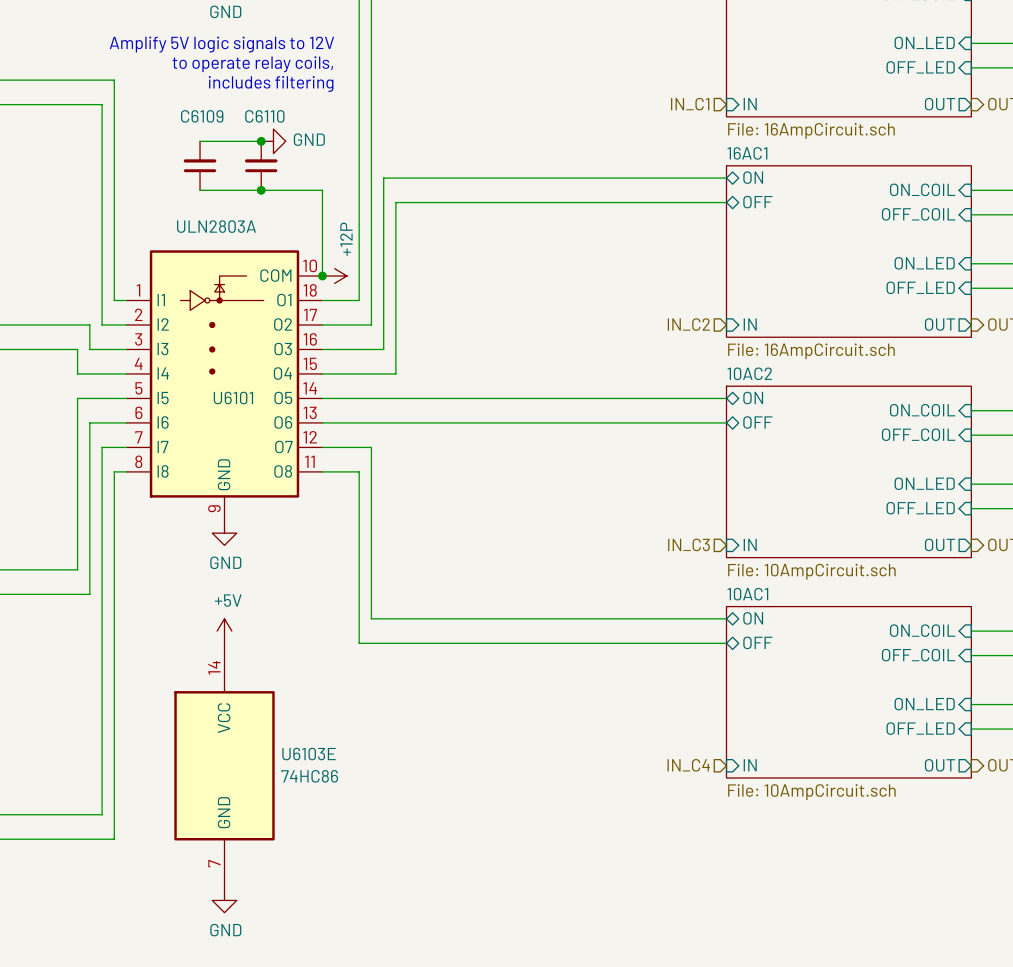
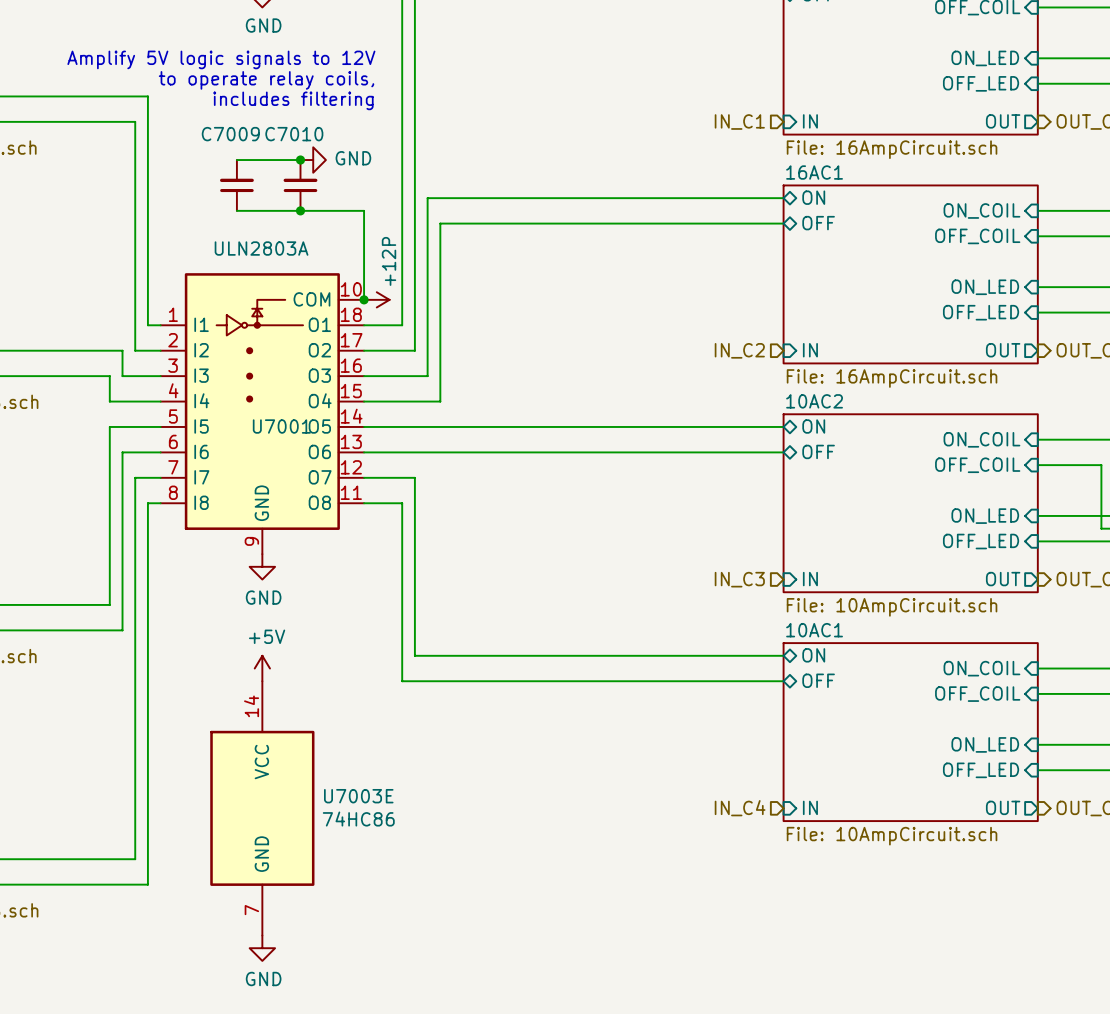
C6109 name: C6109 (202, 116) -> C7009 (230, 134)
C6110 name: C6110 (264, 116) -> C7010 (294, 134)
U6101 name: U6101 (233, 398) -> U7001 (281, 426)
U6103E name: U6103E (309, 754) -> U7003E (358, 796)

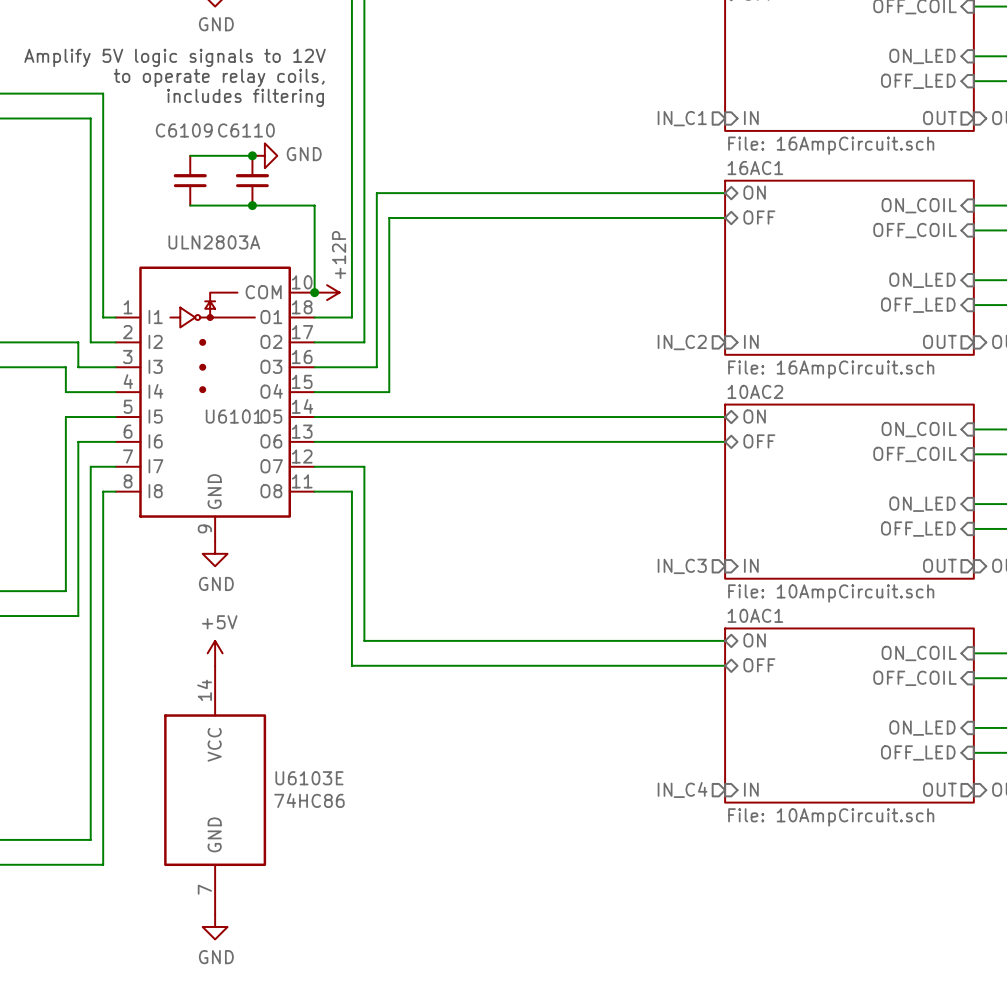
C7009 name: C7009 (230, 134) -> C6109 (184, 130)
C7010 name: C7010 (294, 134) -> C6110 (246, 130)
U7001 name: U7001 (281, 426) -> U6101 (234, 416)
U7003E name: U7003E (358, 796) -> U6103E (309, 778)

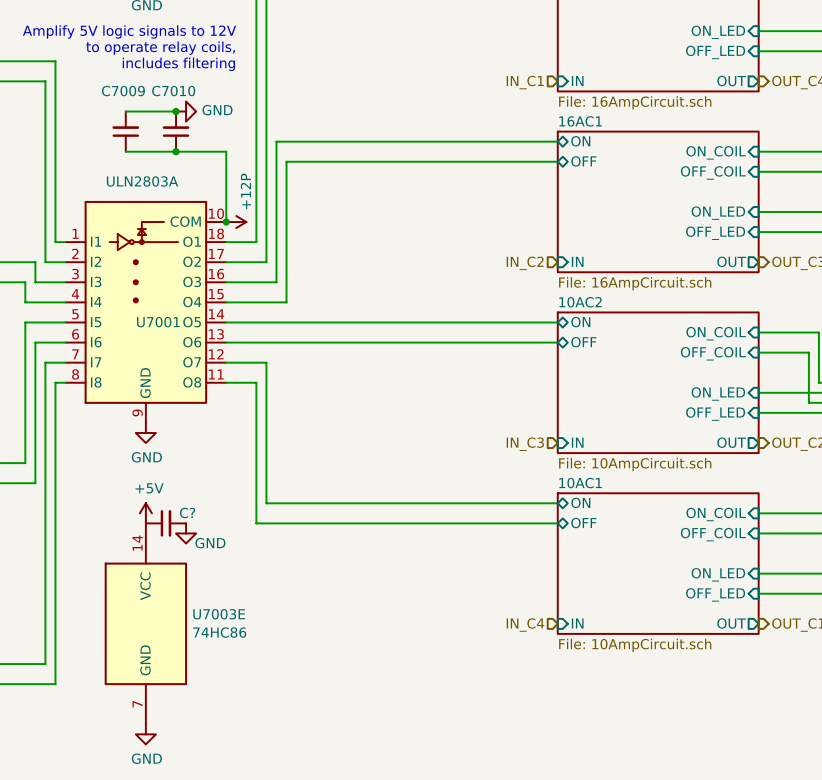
C6109 name: C6109 (184, 130) -> C7009 (123, 91)
C6110 name: C6110 (246, 130) -> C7010 (173, 91)
U6101 name: U6101 (234, 416) -> U7001 (158, 322)
C?: none -> (165, 523)
power symbol: none -> GND (186, 533)
U6103E name: U6103E (309, 778) -> U7003E (219, 614)

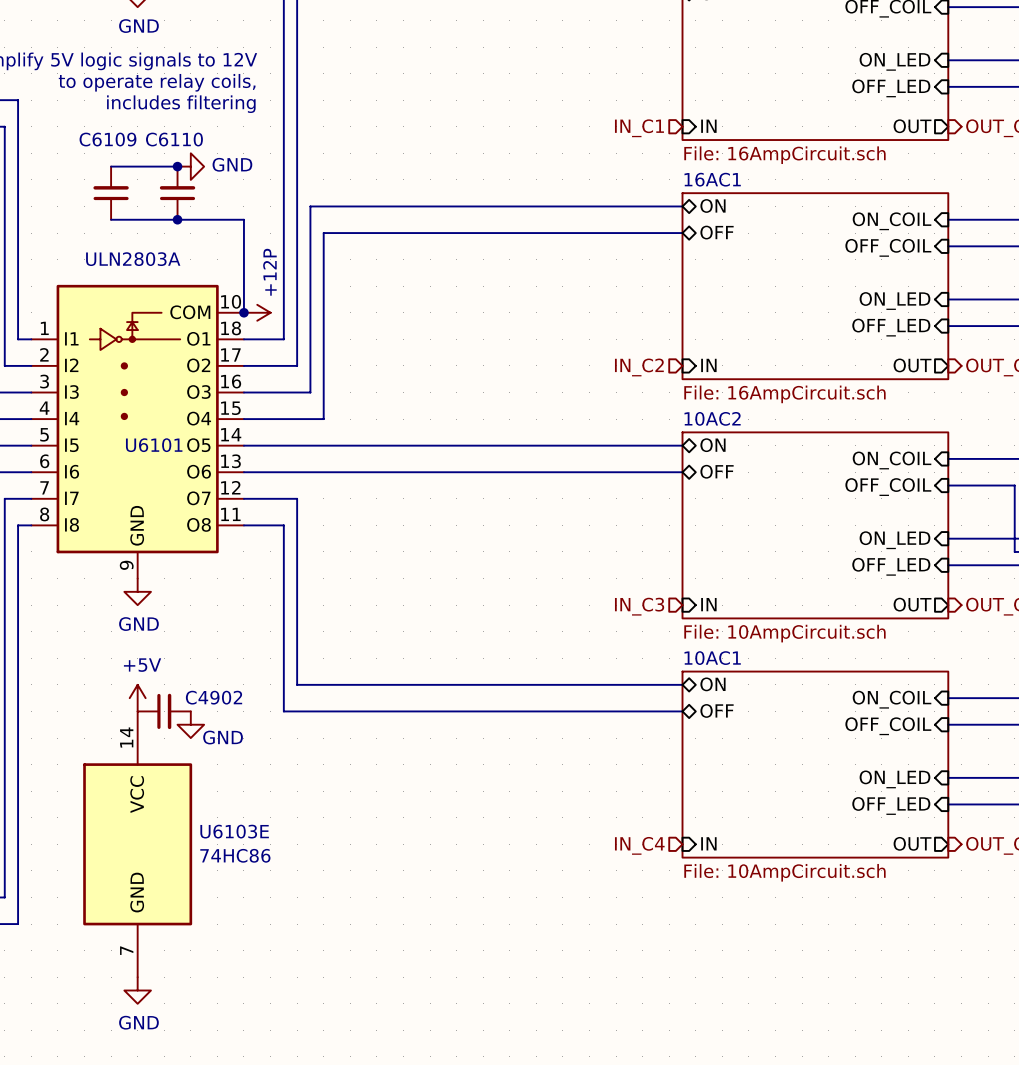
C7009 name: C7009 (123, 91) -> C6109 (107, 139)
C7010 name: C7010 (173, 91) -> C6110 (174, 139)
U7001 name: U7001 (158, 322) -> U6101 (154, 445)
C? name: C? (187, 512) -> C4902 (214, 697)
U7003E name: U7003E (219, 614) -> U6103E (234, 831)

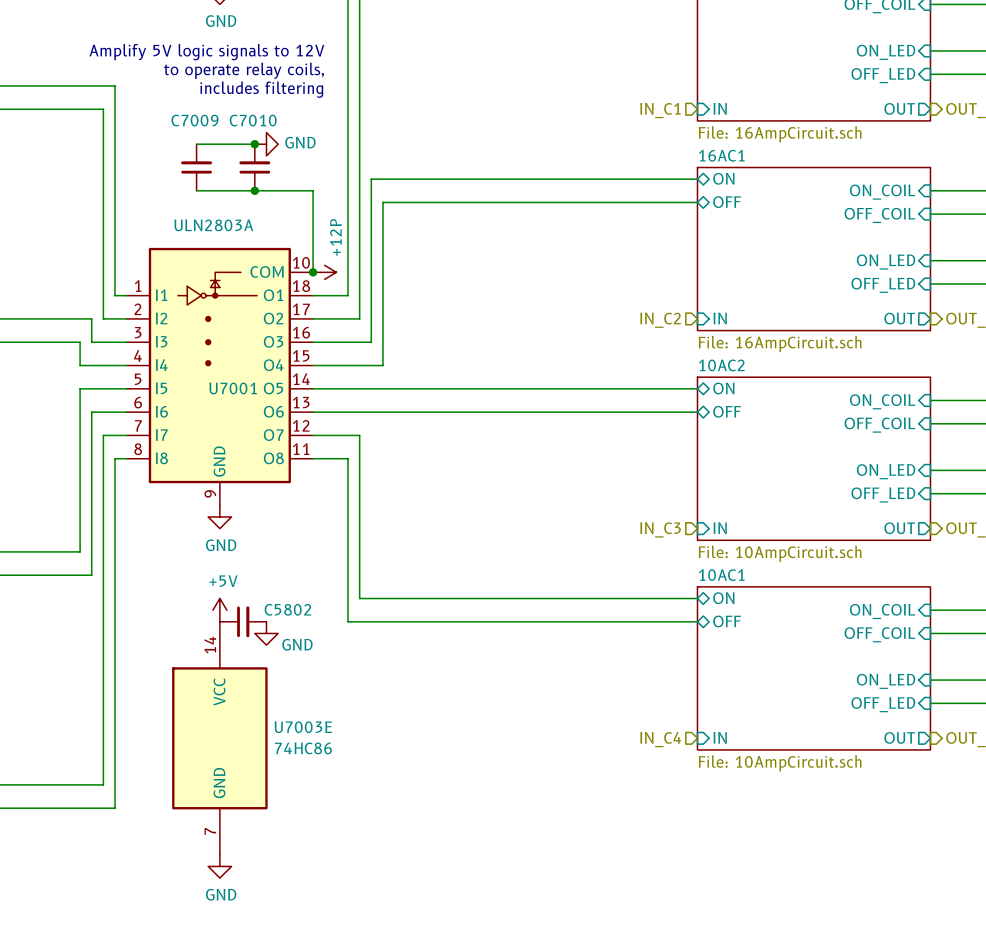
C6109 name: C6109 (107, 139) -> C7009 (195, 120)
C6110 name: C6110 (174, 139) -> C7010 (253, 120)
U6101 name: U6101 (154, 445) -> U7001 (233, 388)
C4902 name: C4902 (214, 697) -> C5802 (287, 609)
U6103E name: U6103E (234, 831) -> U7003E (303, 727)

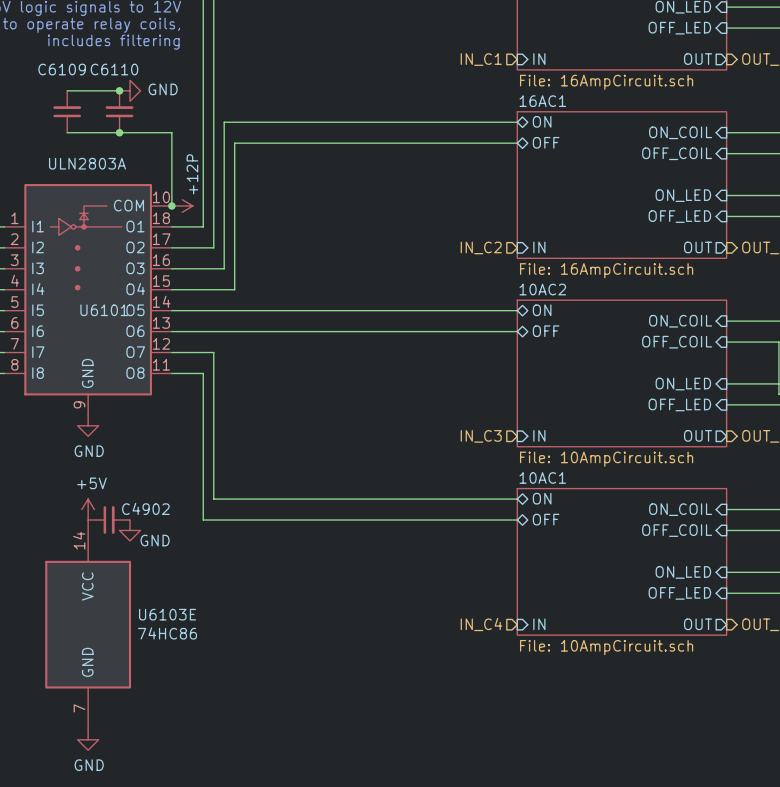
C7009 name: C7009 (195, 120) -> C6109 (62, 69)
C7010 name: C7010 (253, 120) -> C6110 (114, 69)
U7001 name: U7001 (233, 388) -> U6101 (104, 310)
C5802 name: C5802 (287, 609) -> C4902 (145, 508)
U7003E name: U7003E (303, 727) -> U6103E (167, 614)

